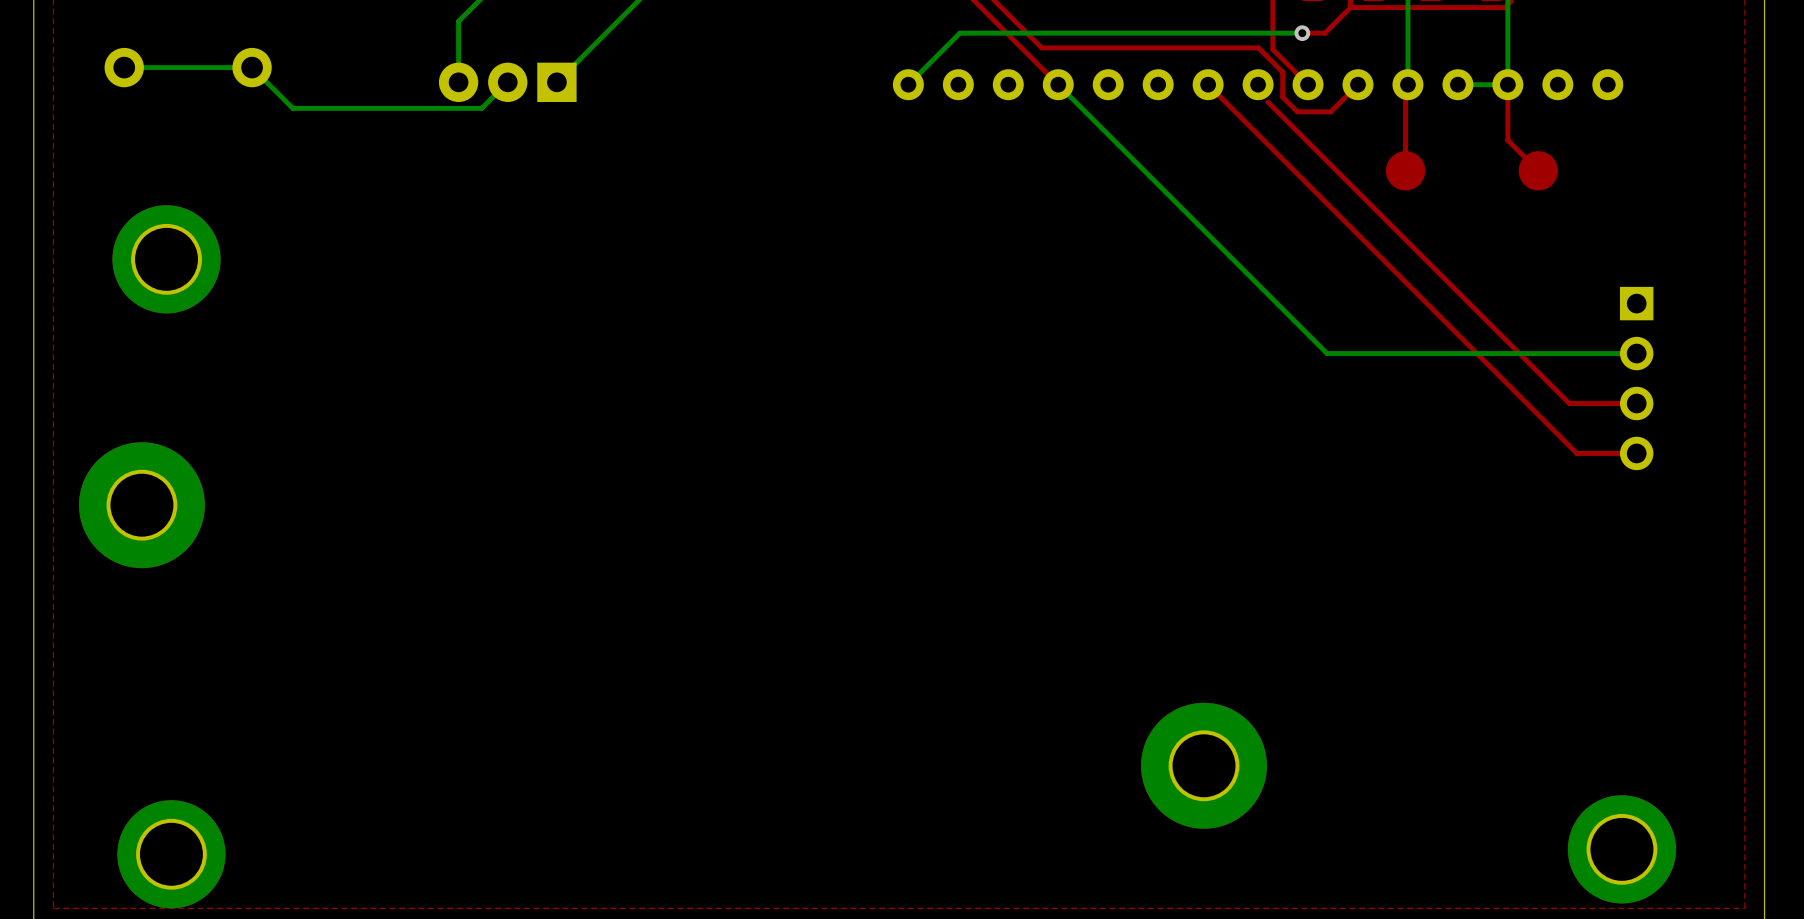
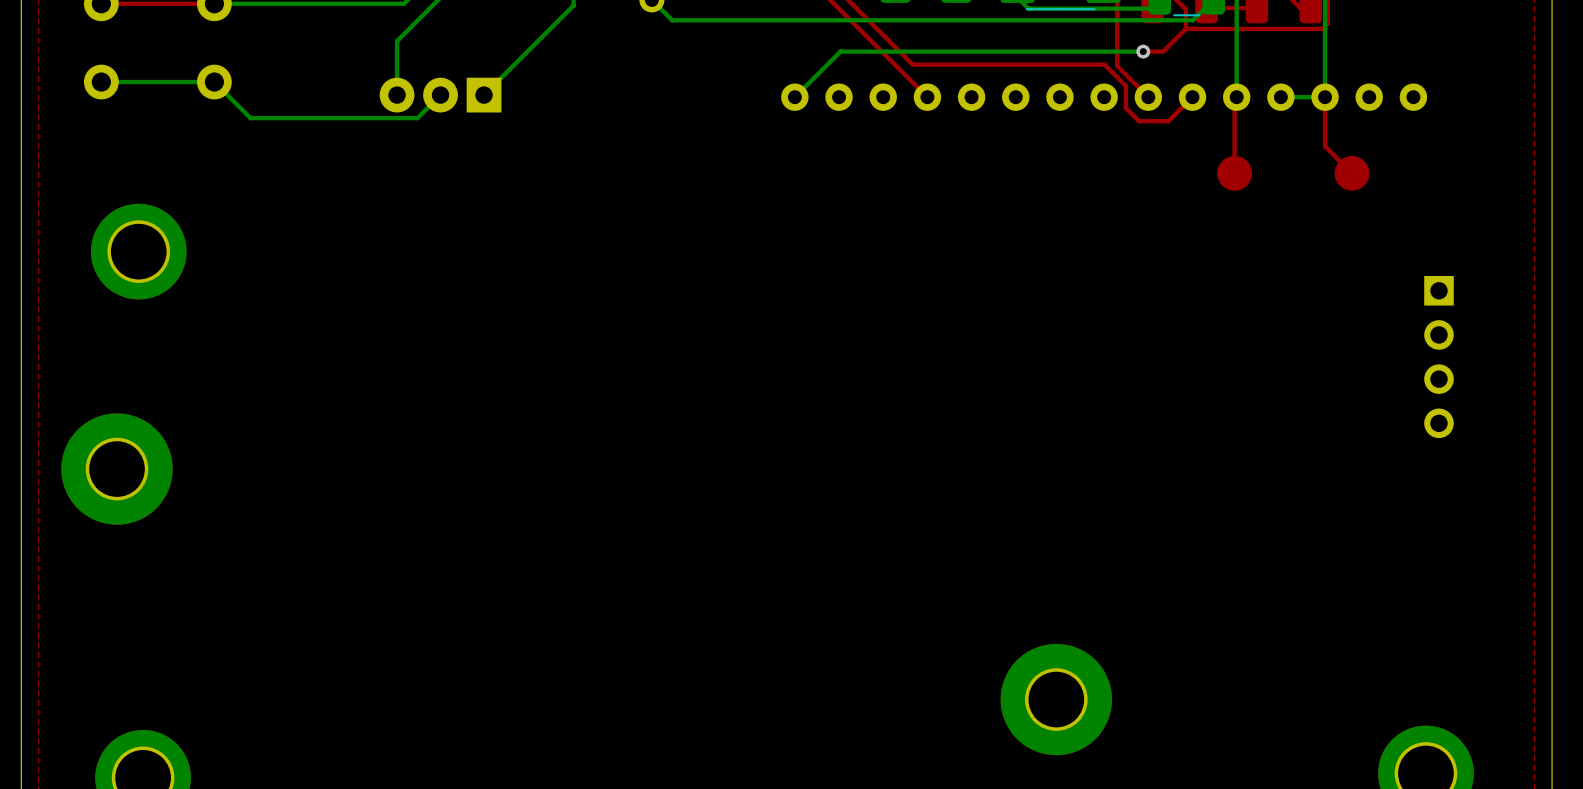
bottom track: (1058, 84) (1327, 353) (1636, 353) -> none
top track: (1208, 84) (1576, 453) (1636, 453) -> none
top track: (1267, 101) (1569, 403) (1636, 403) -> none

